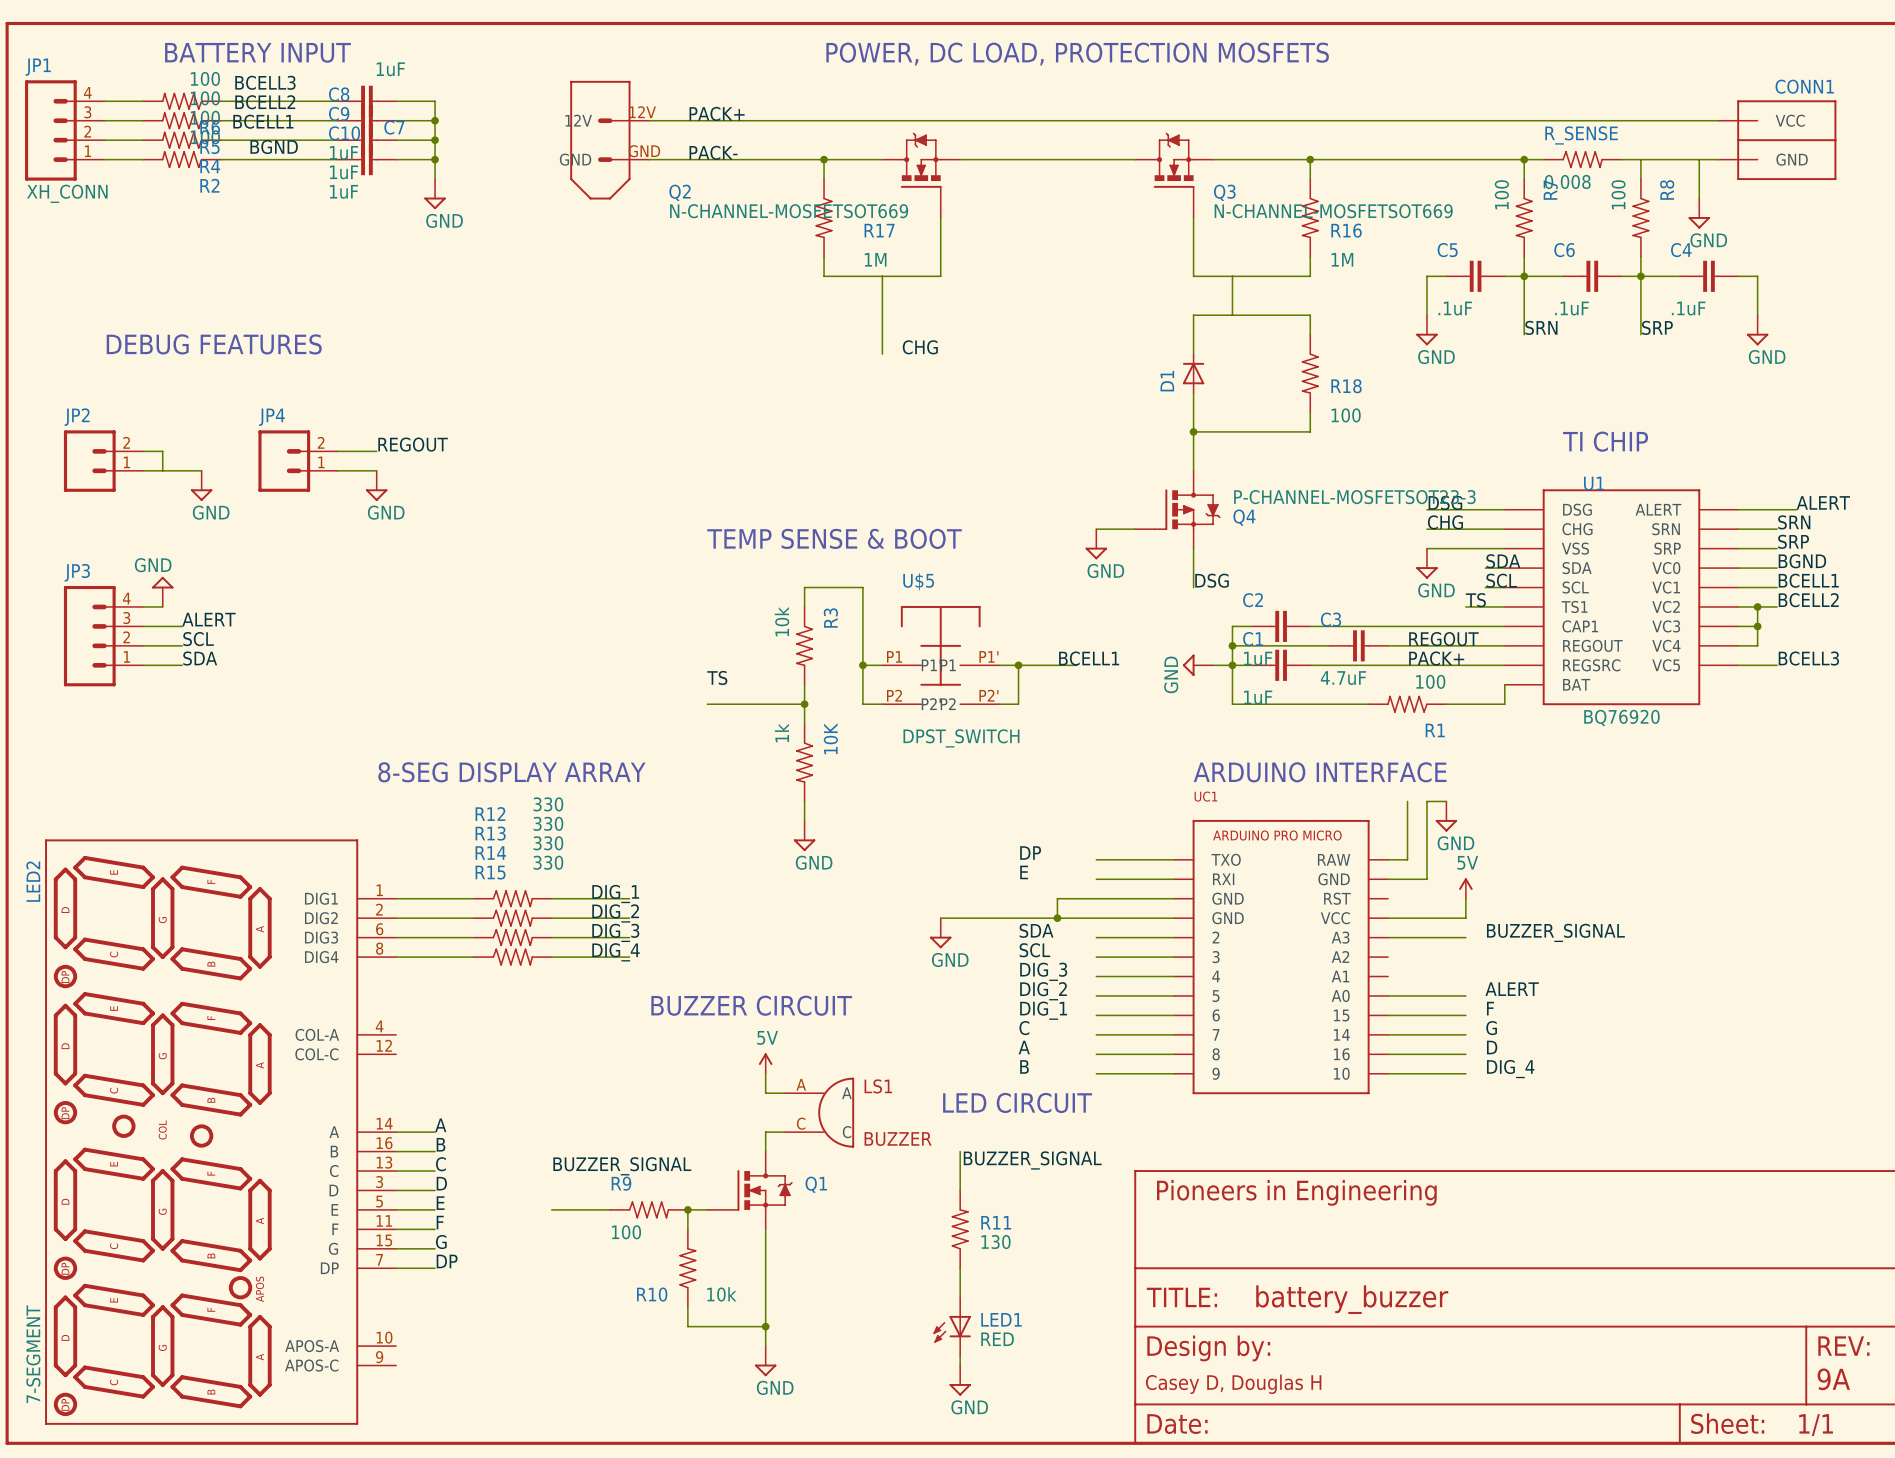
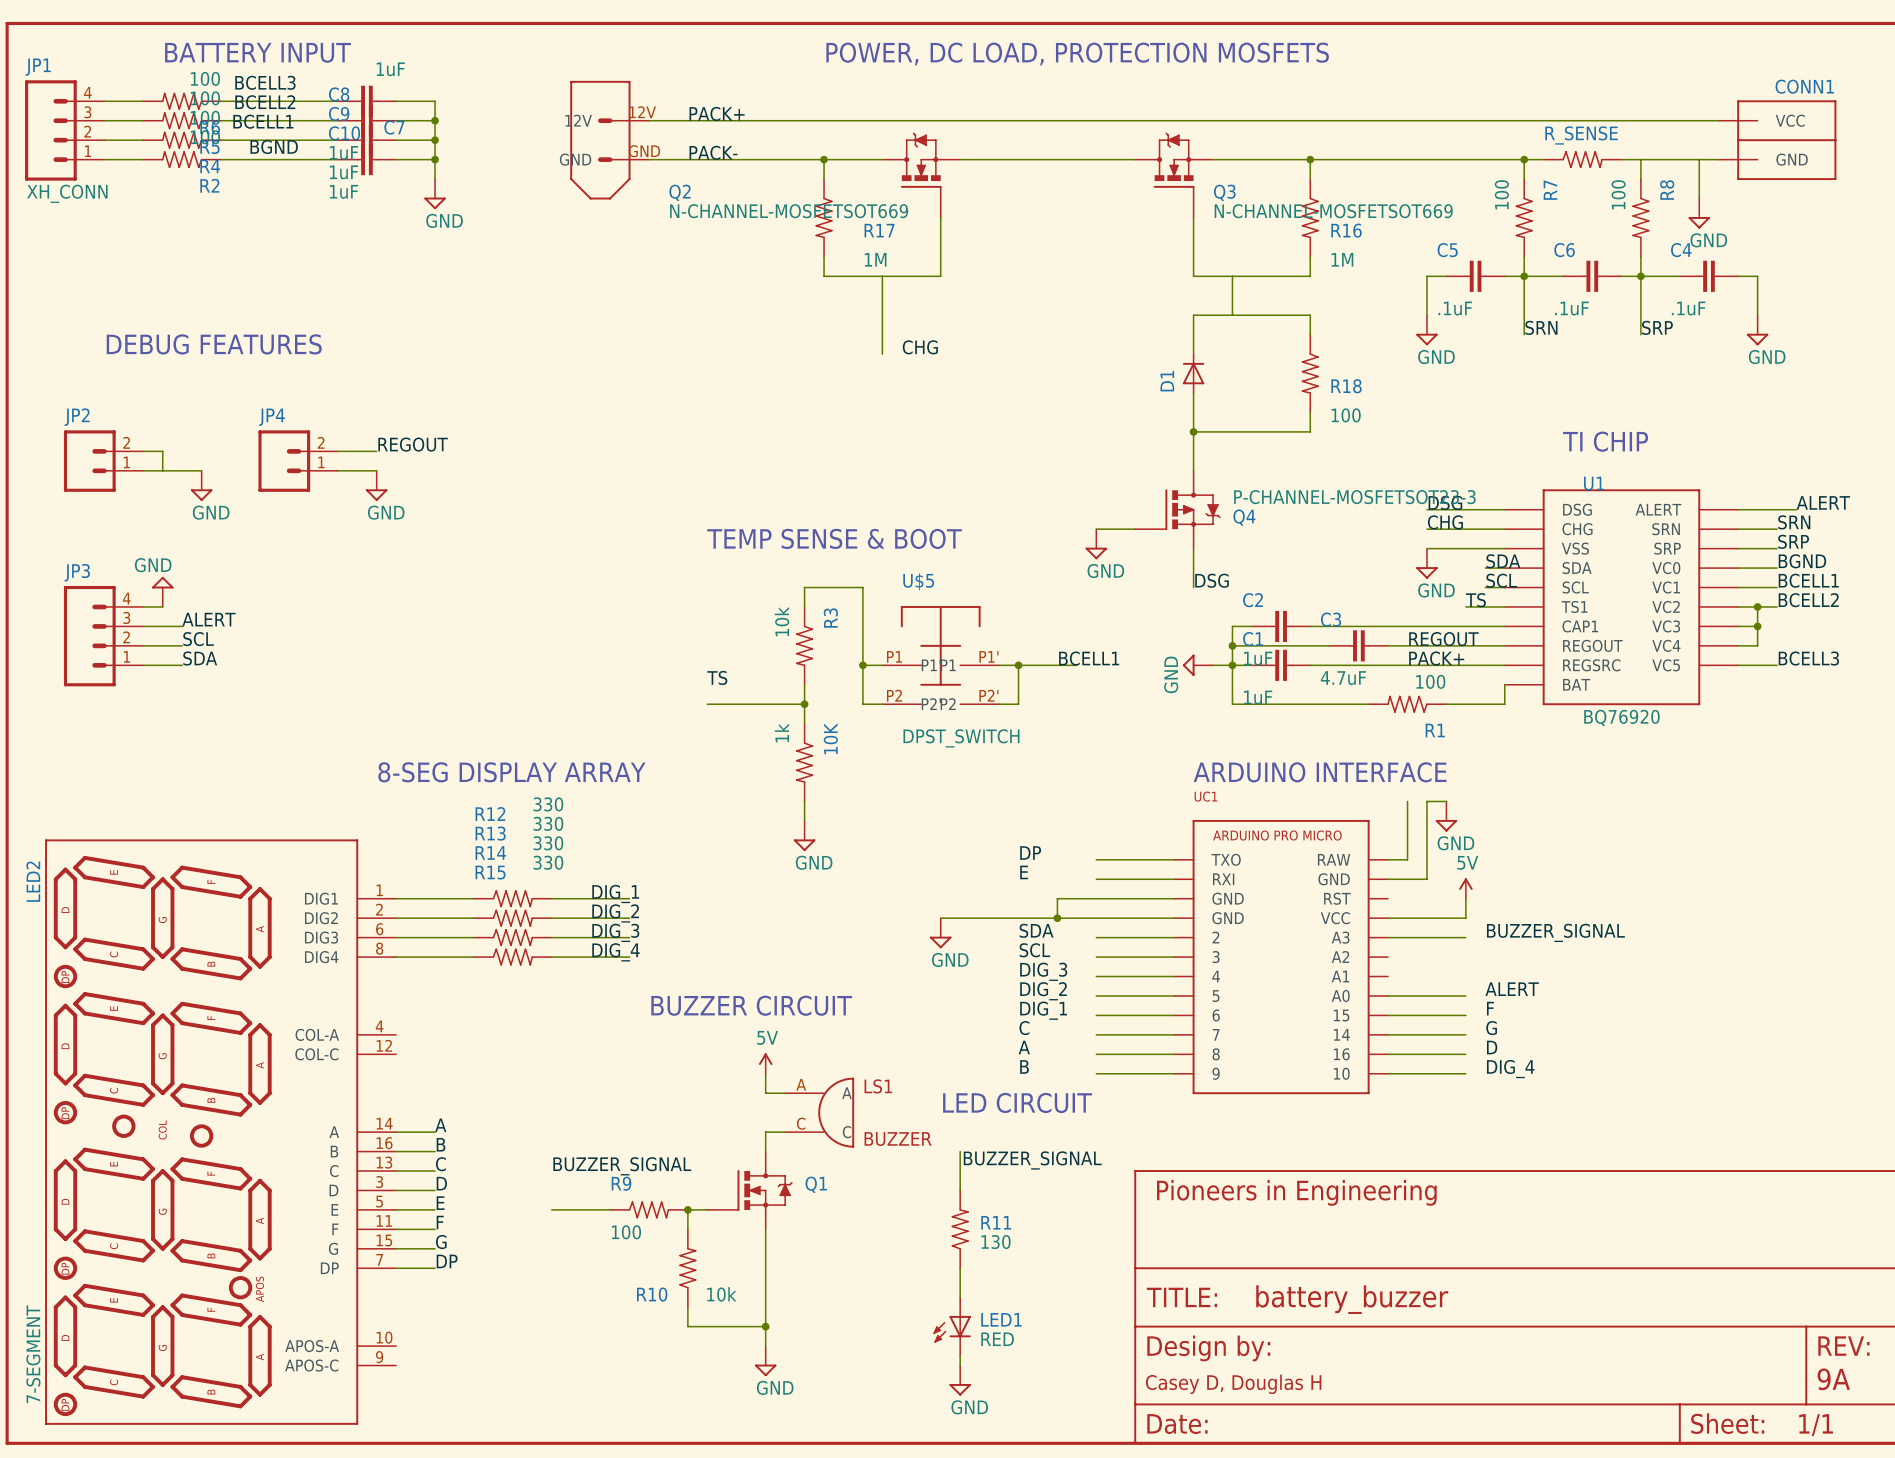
R_SENSE value: 0.008 (1567, 182) -> none

